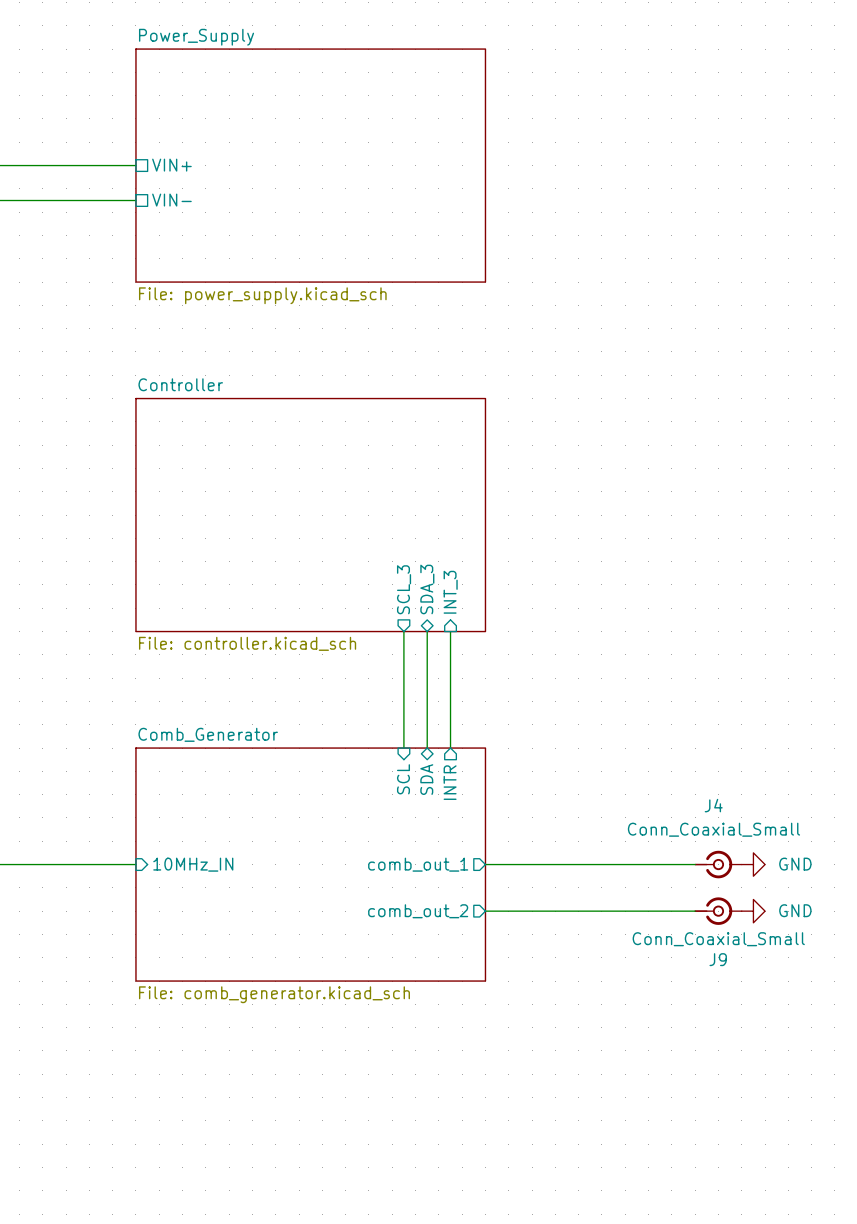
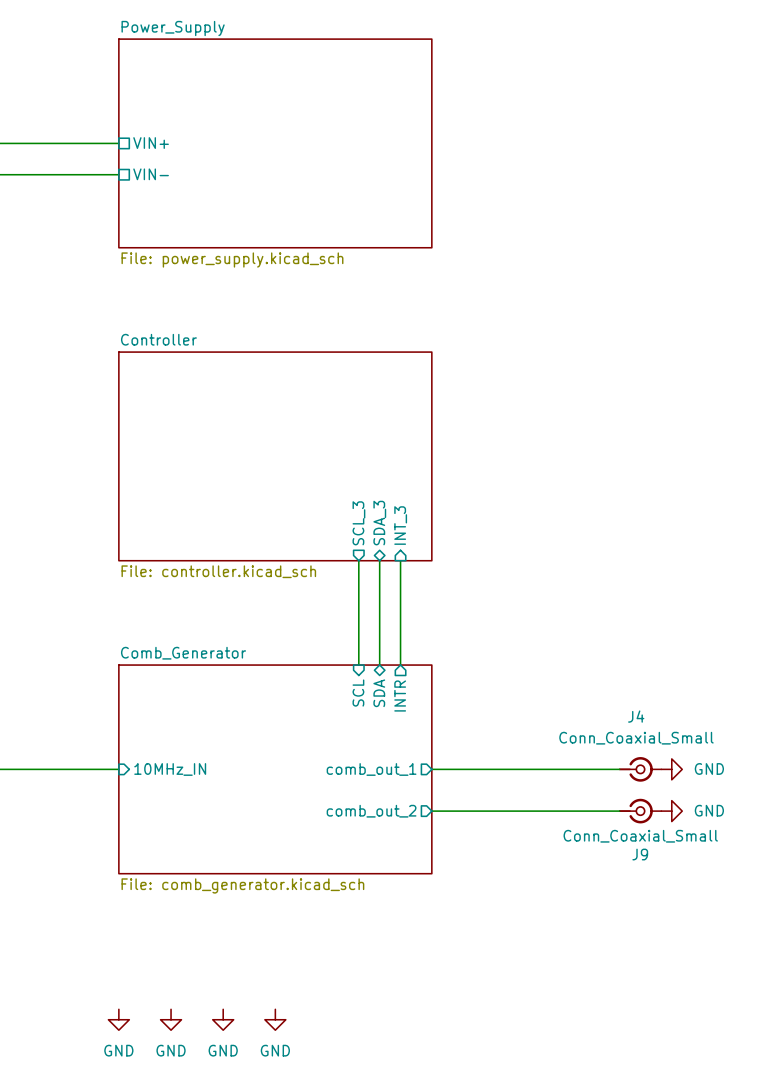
power symbol: none -> GND (118, 1019)
power symbol: none -> GND (171, 1019)
power symbol: none -> GND (223, 1019)
power symbol: none -> GND (275, 1019)

